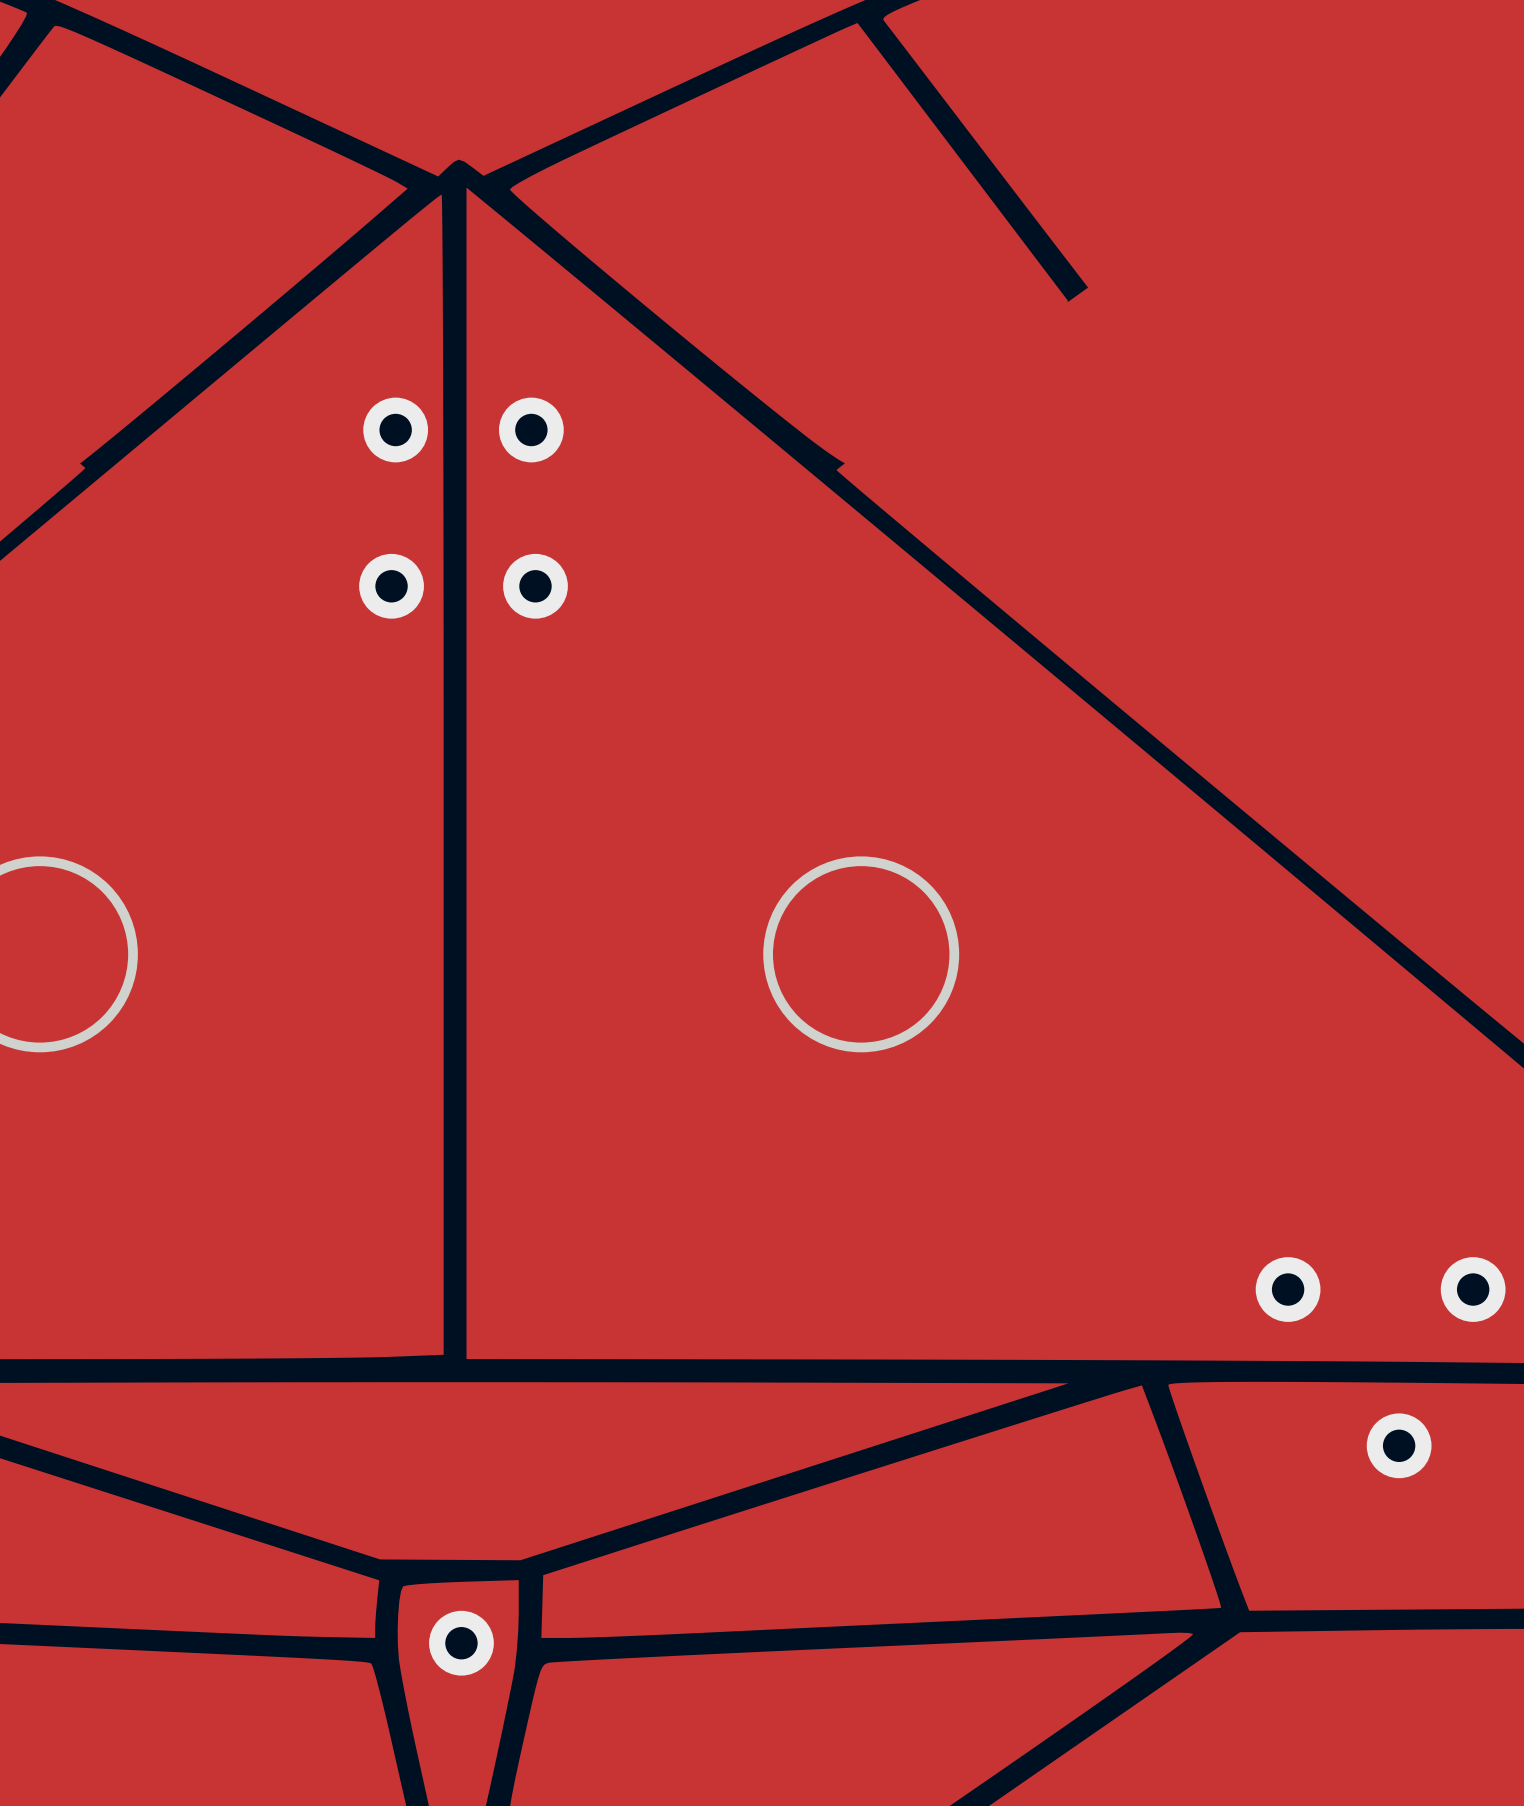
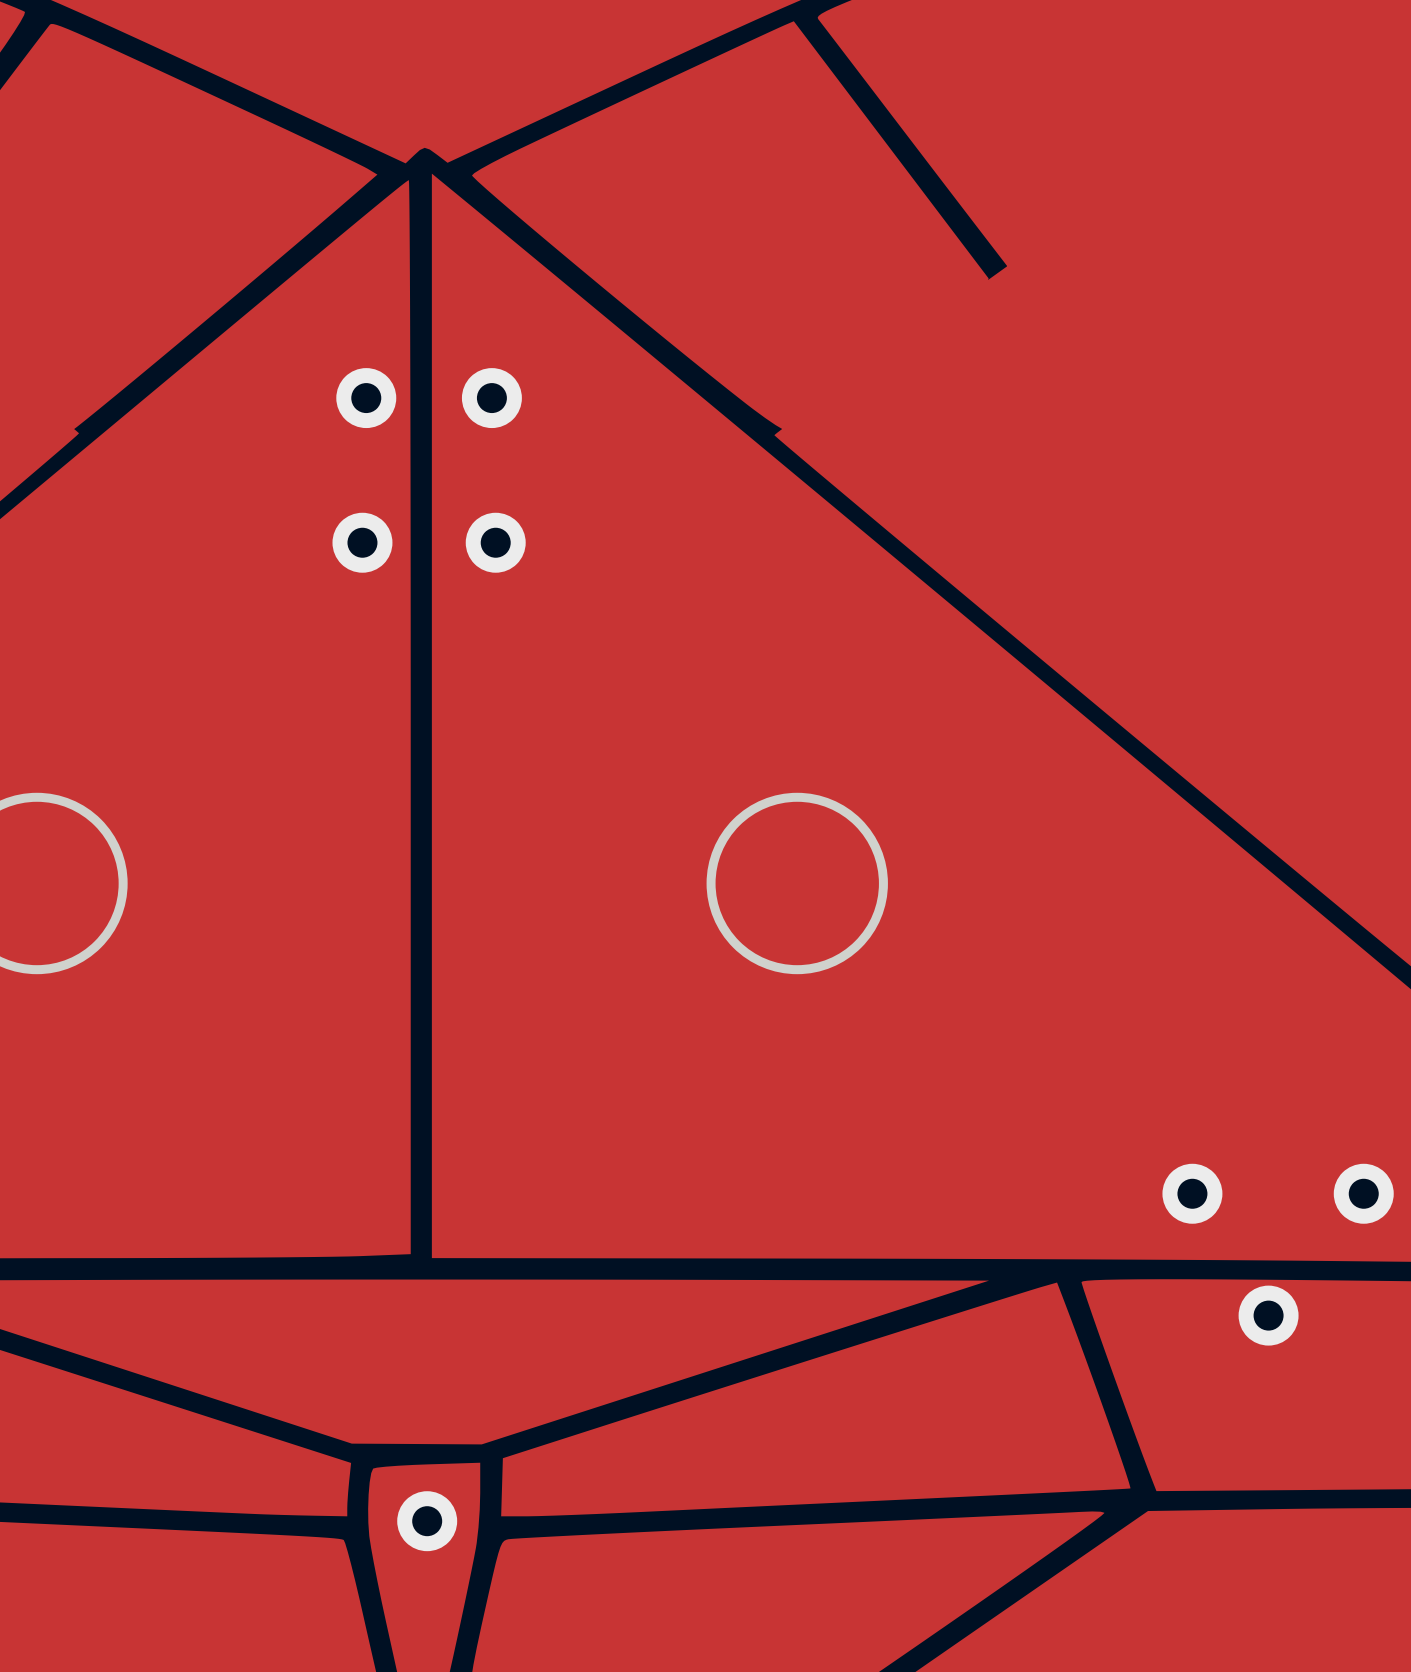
via position: (1399, 1445) -> (1268, 1315)

